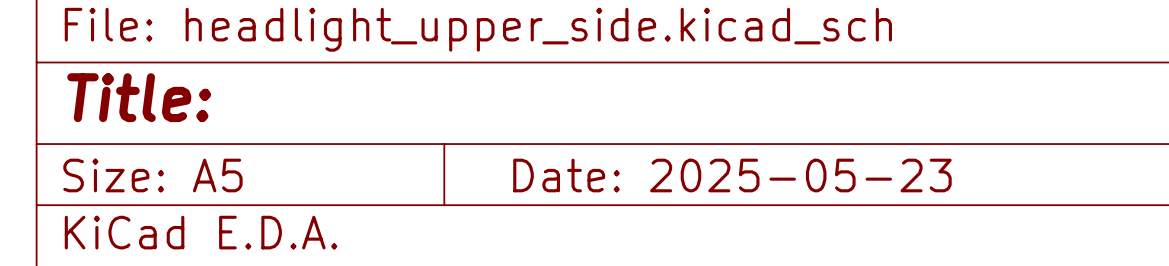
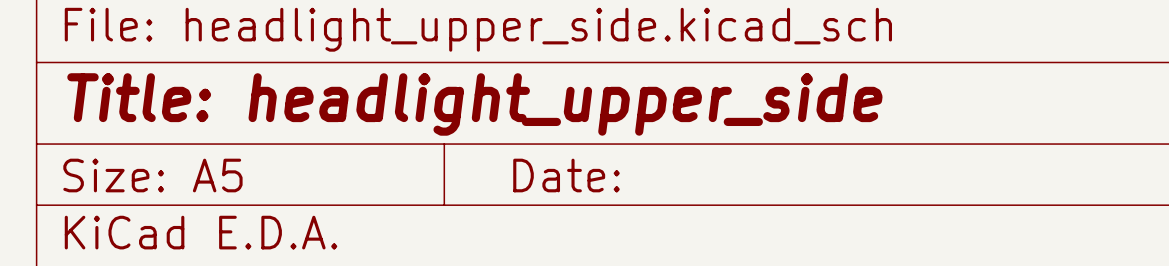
title block: Title: (139, 97) -> Title: headlight_upper_side (474, 104)
title block: Date: 2025-05-23 (732, 175) -> Date: (566, 175)

